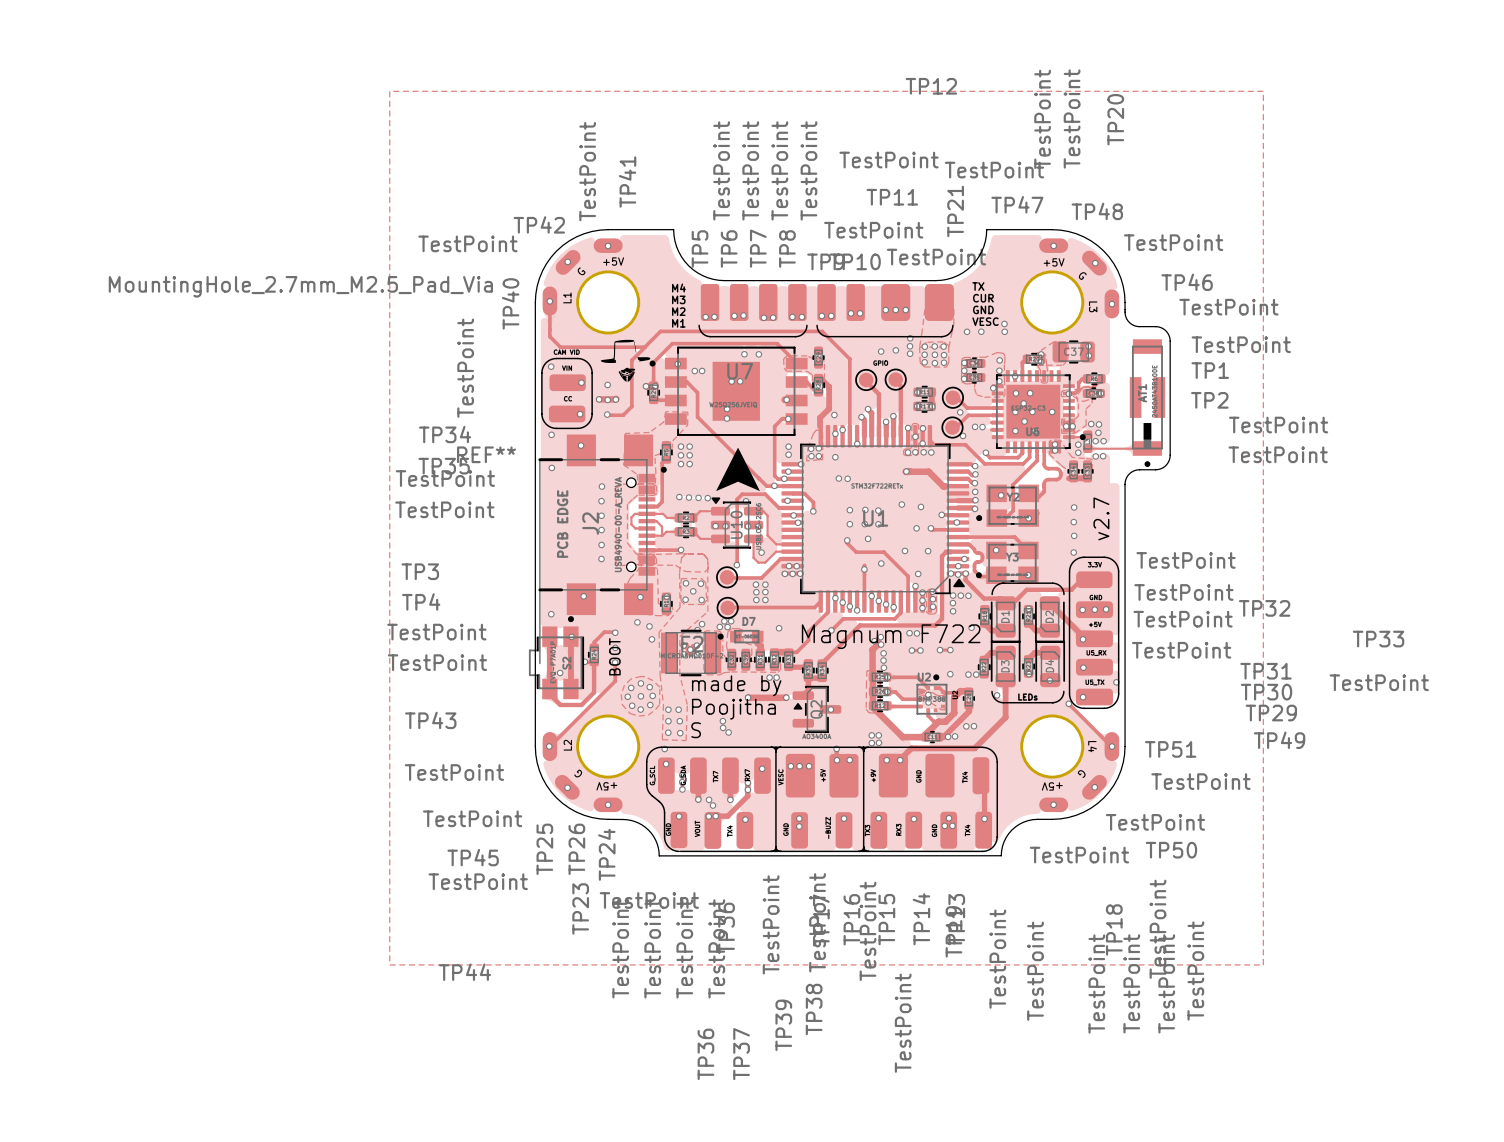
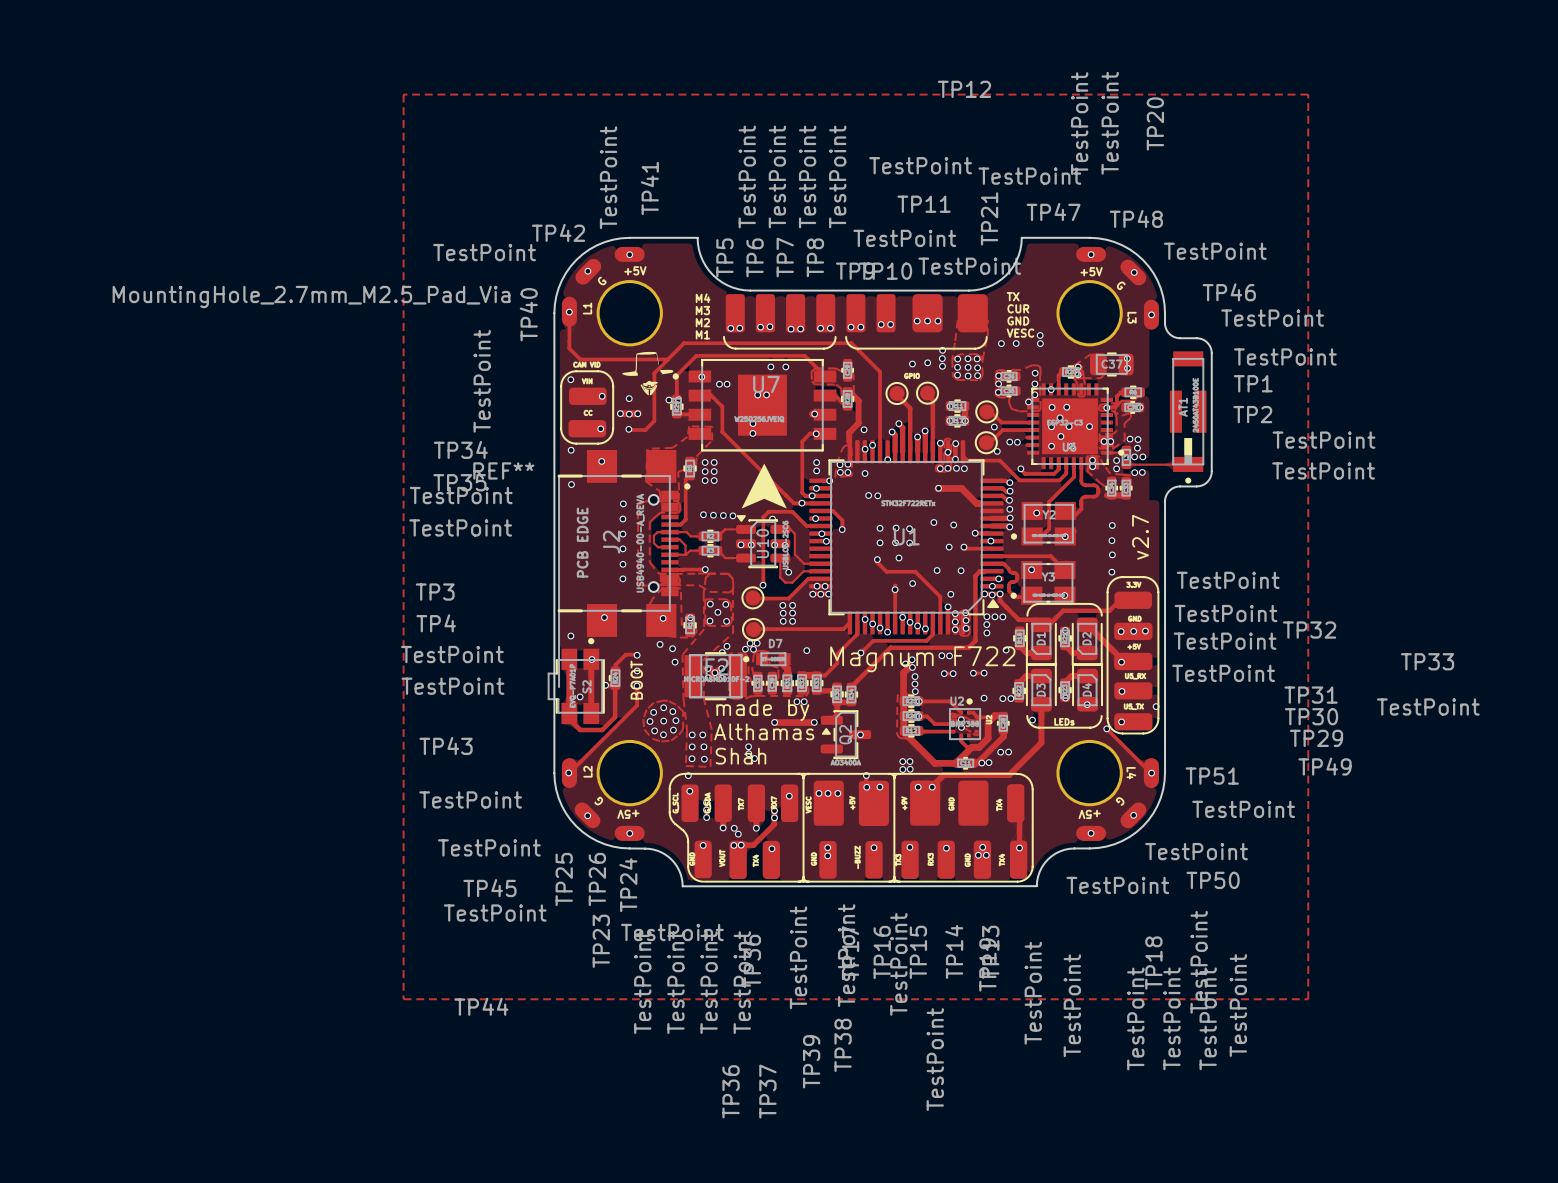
text: Poojitha (733, 709) -> Althamas (764, 731)
text: S (696, 730) -> Shah (740, 756)

